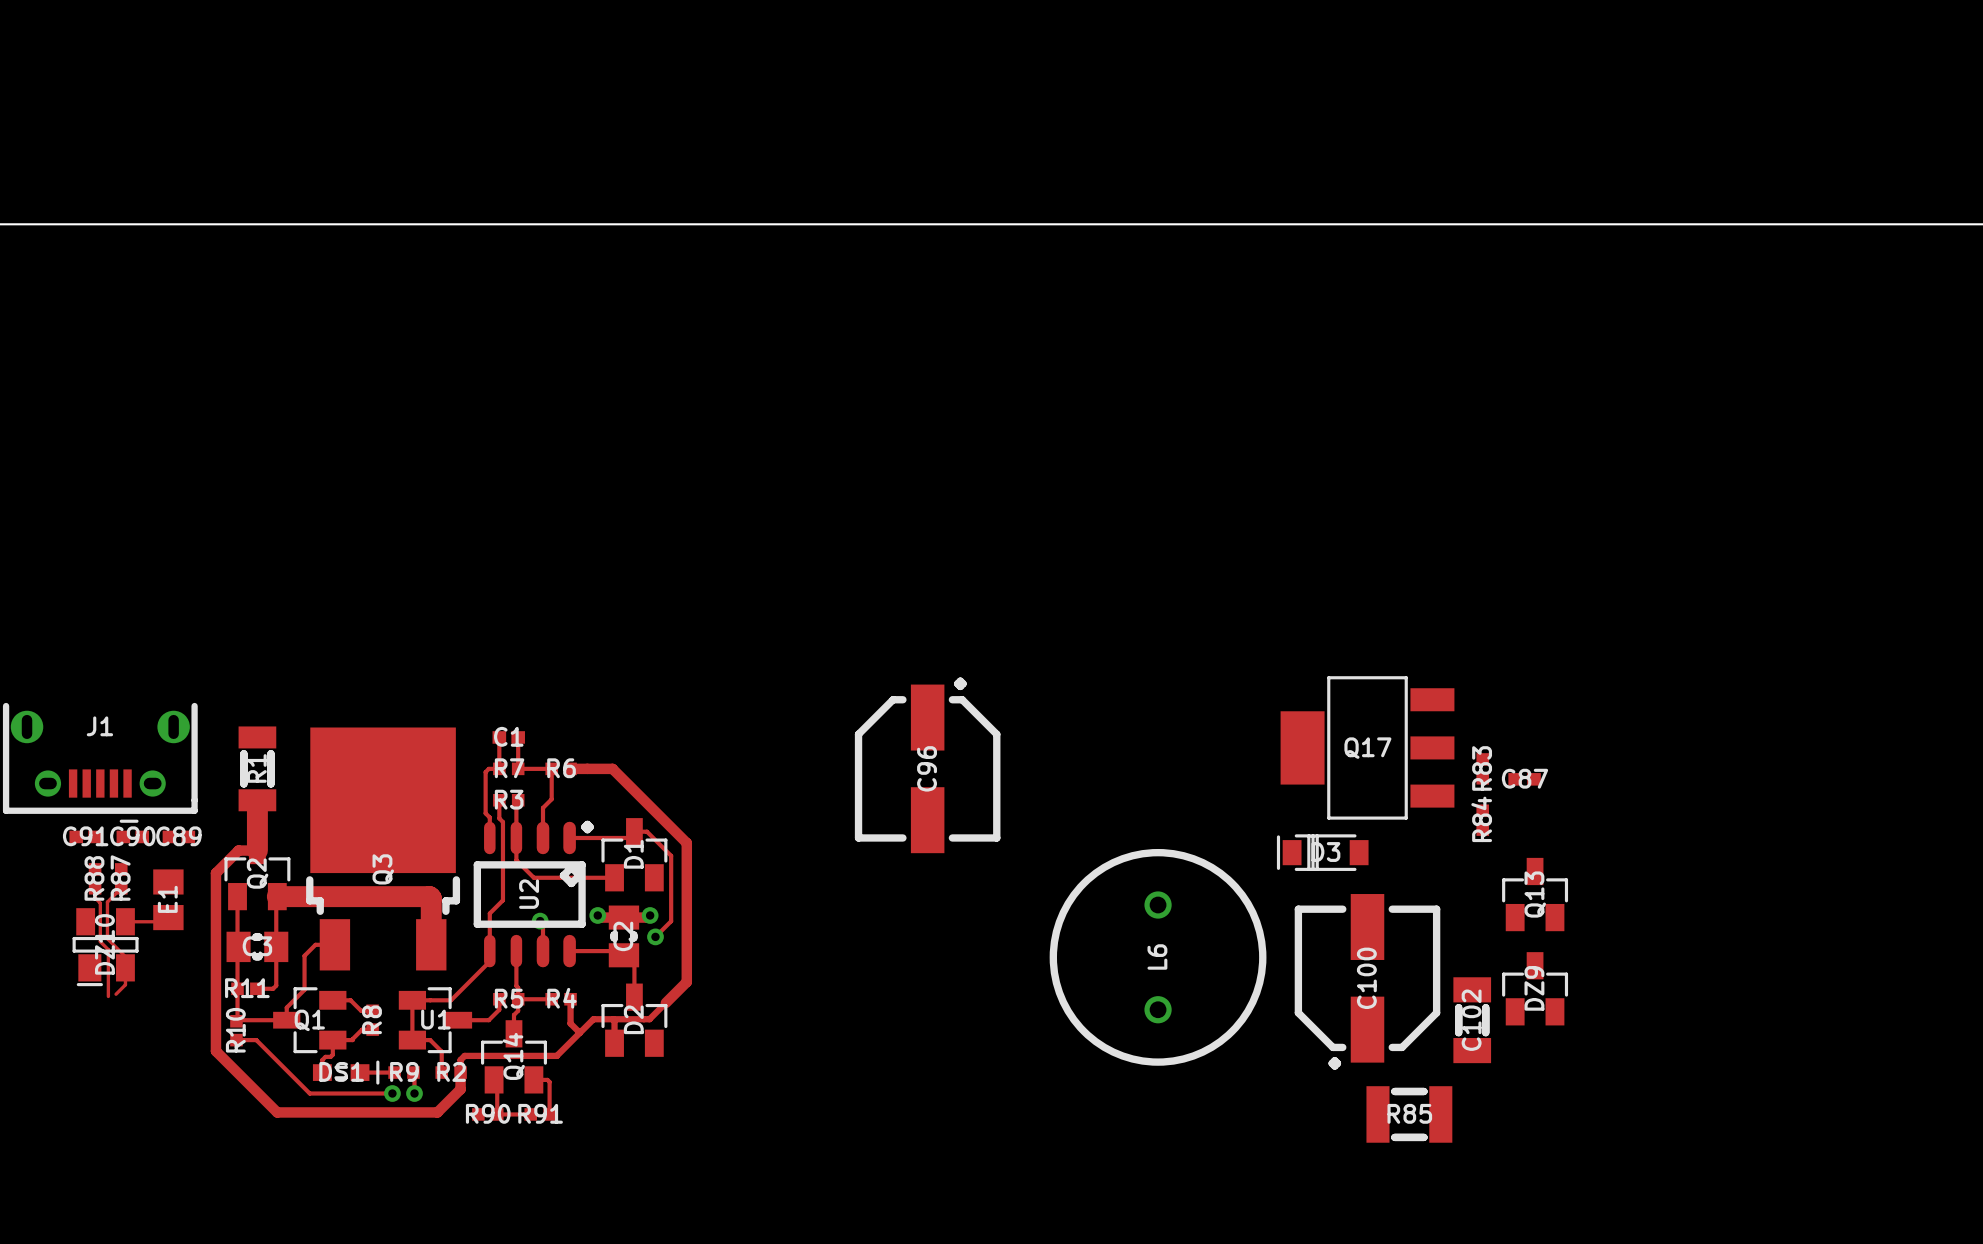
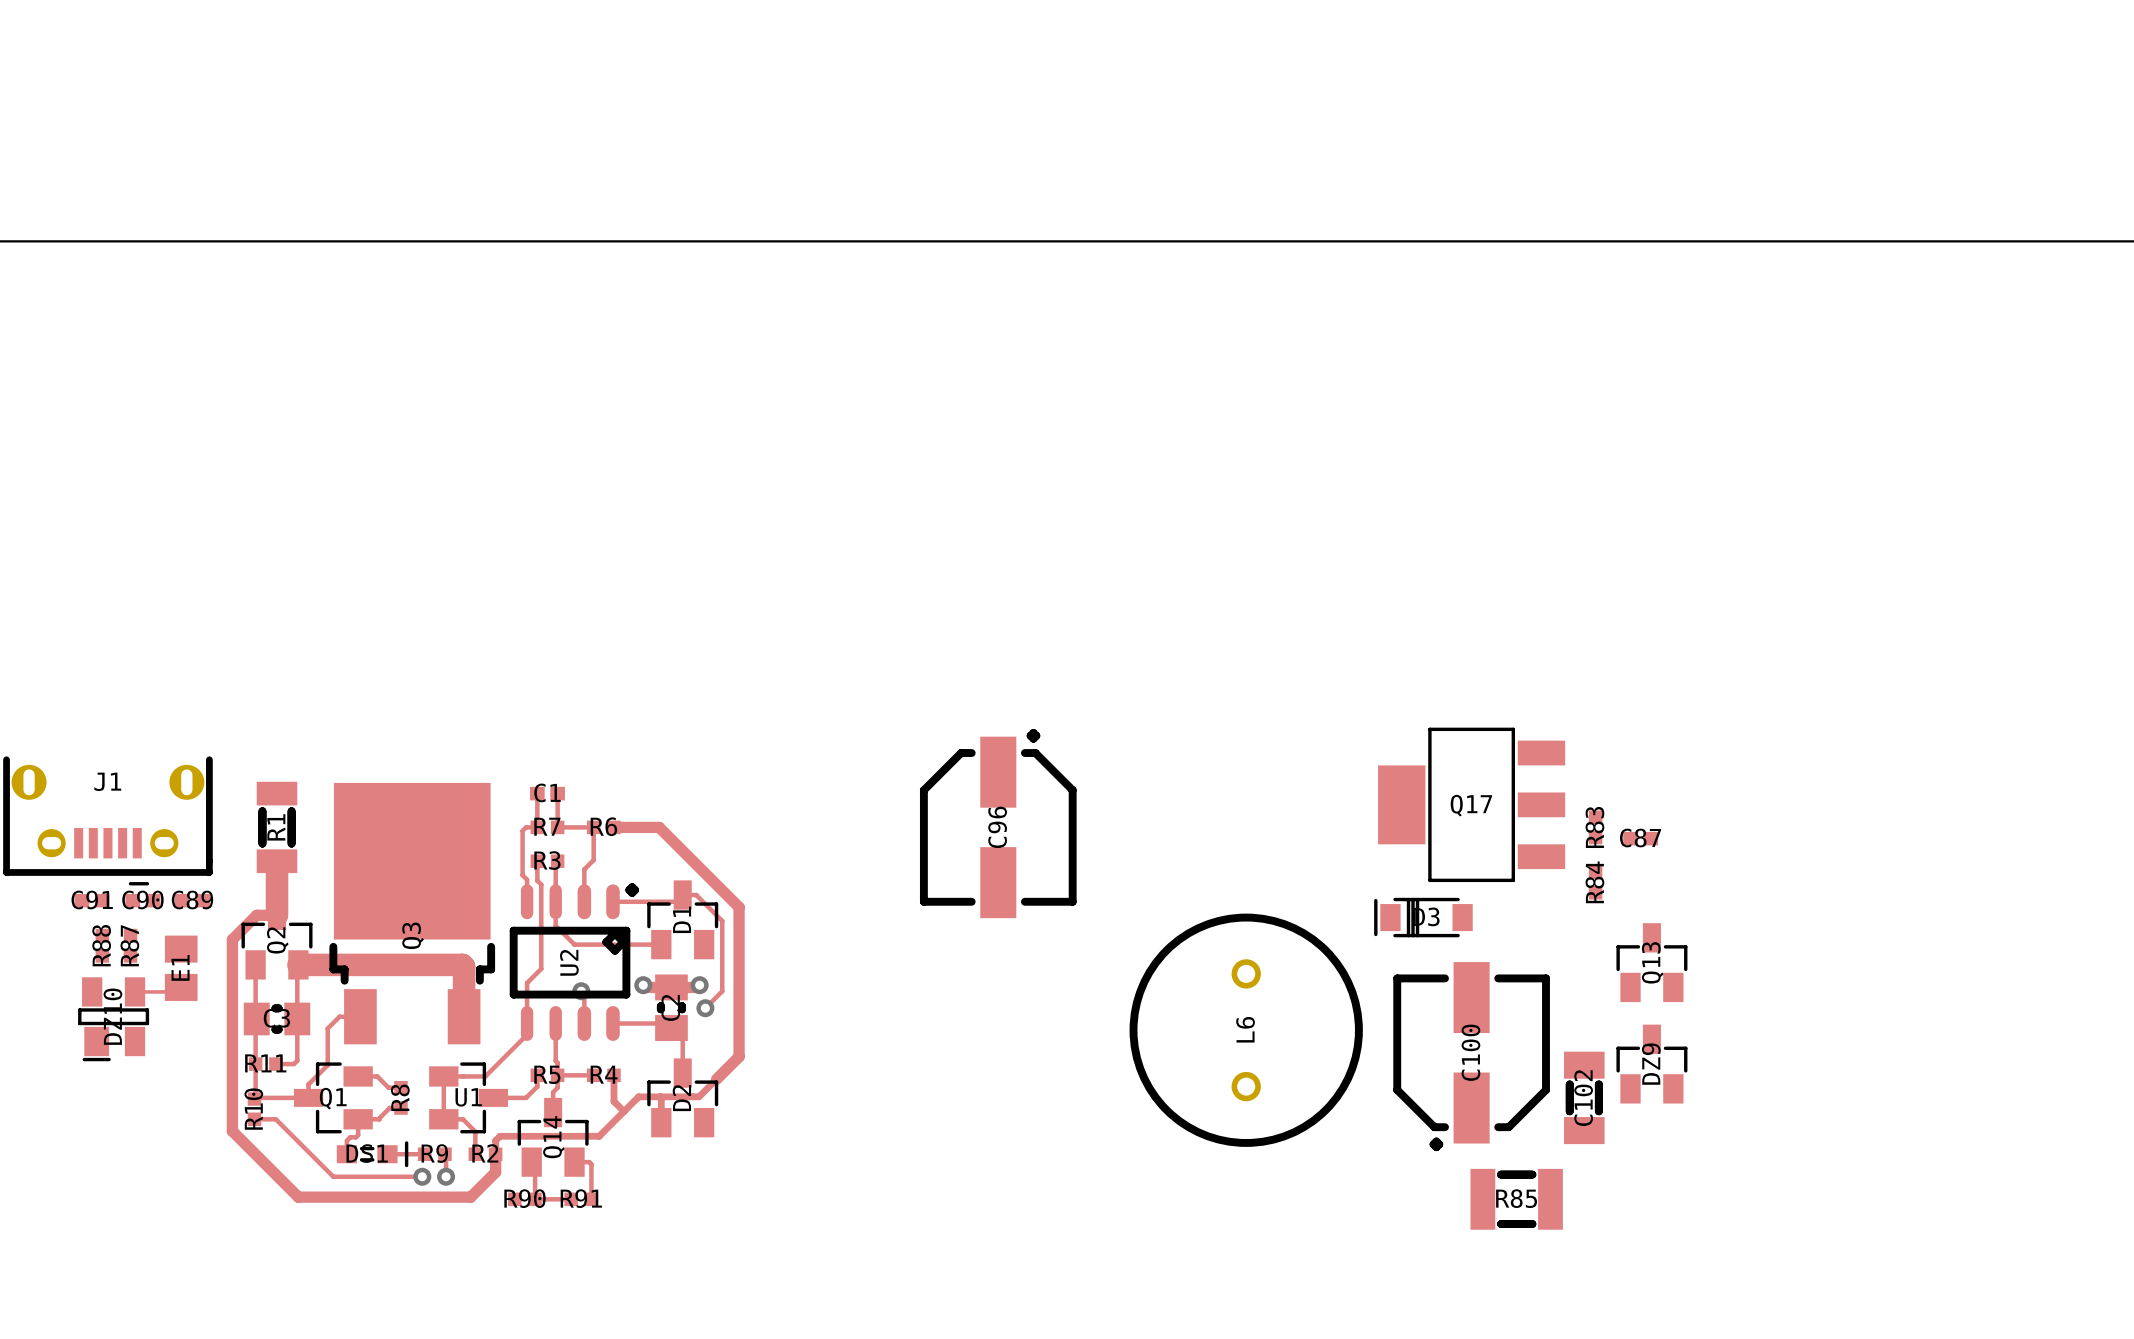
track: (95, 888) (95, 897) (100, 903) (100, 941) (108, 949) (108, 996) -> none
track: (121, 888) (107, 902) (107, 938) (125, 956) -> none
track: (125, 967) (125, 984) (116, 994) -> none

